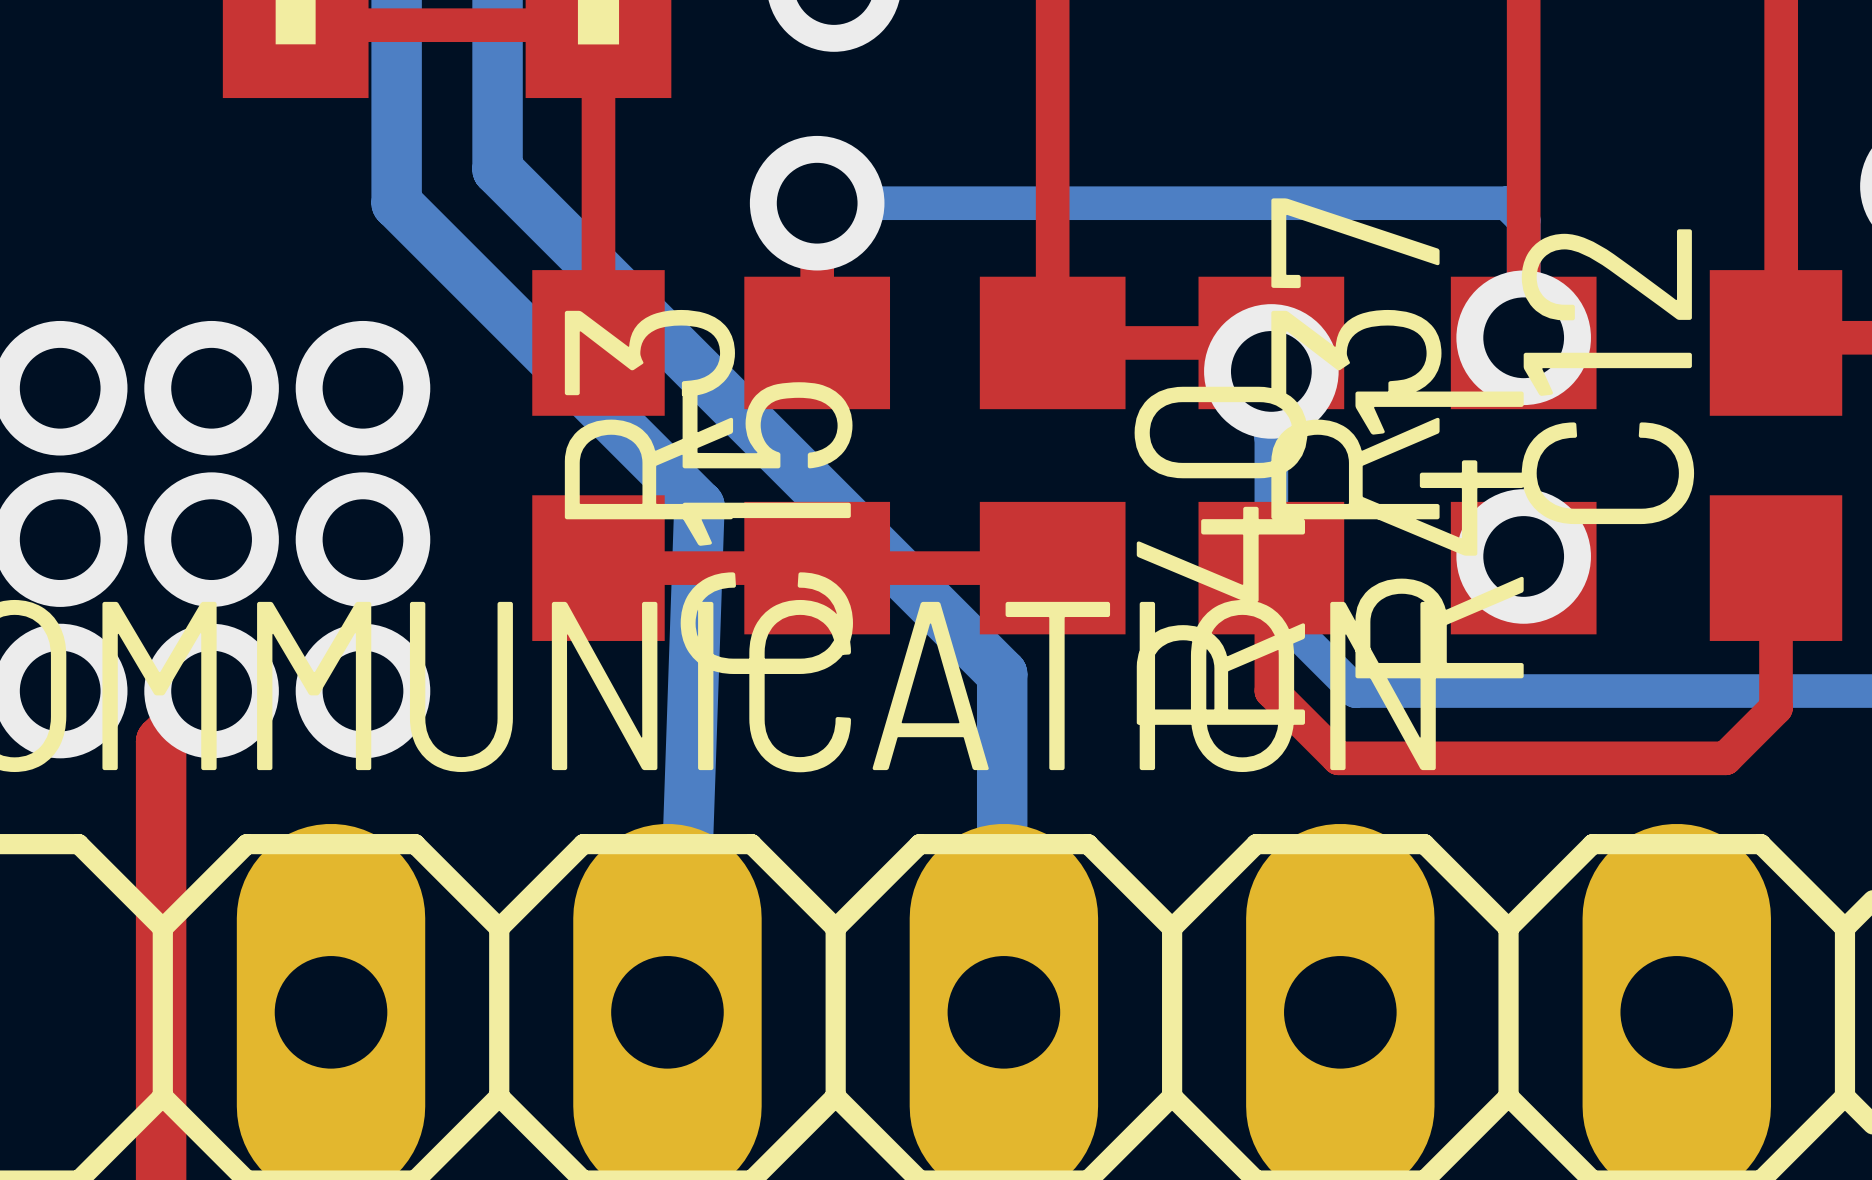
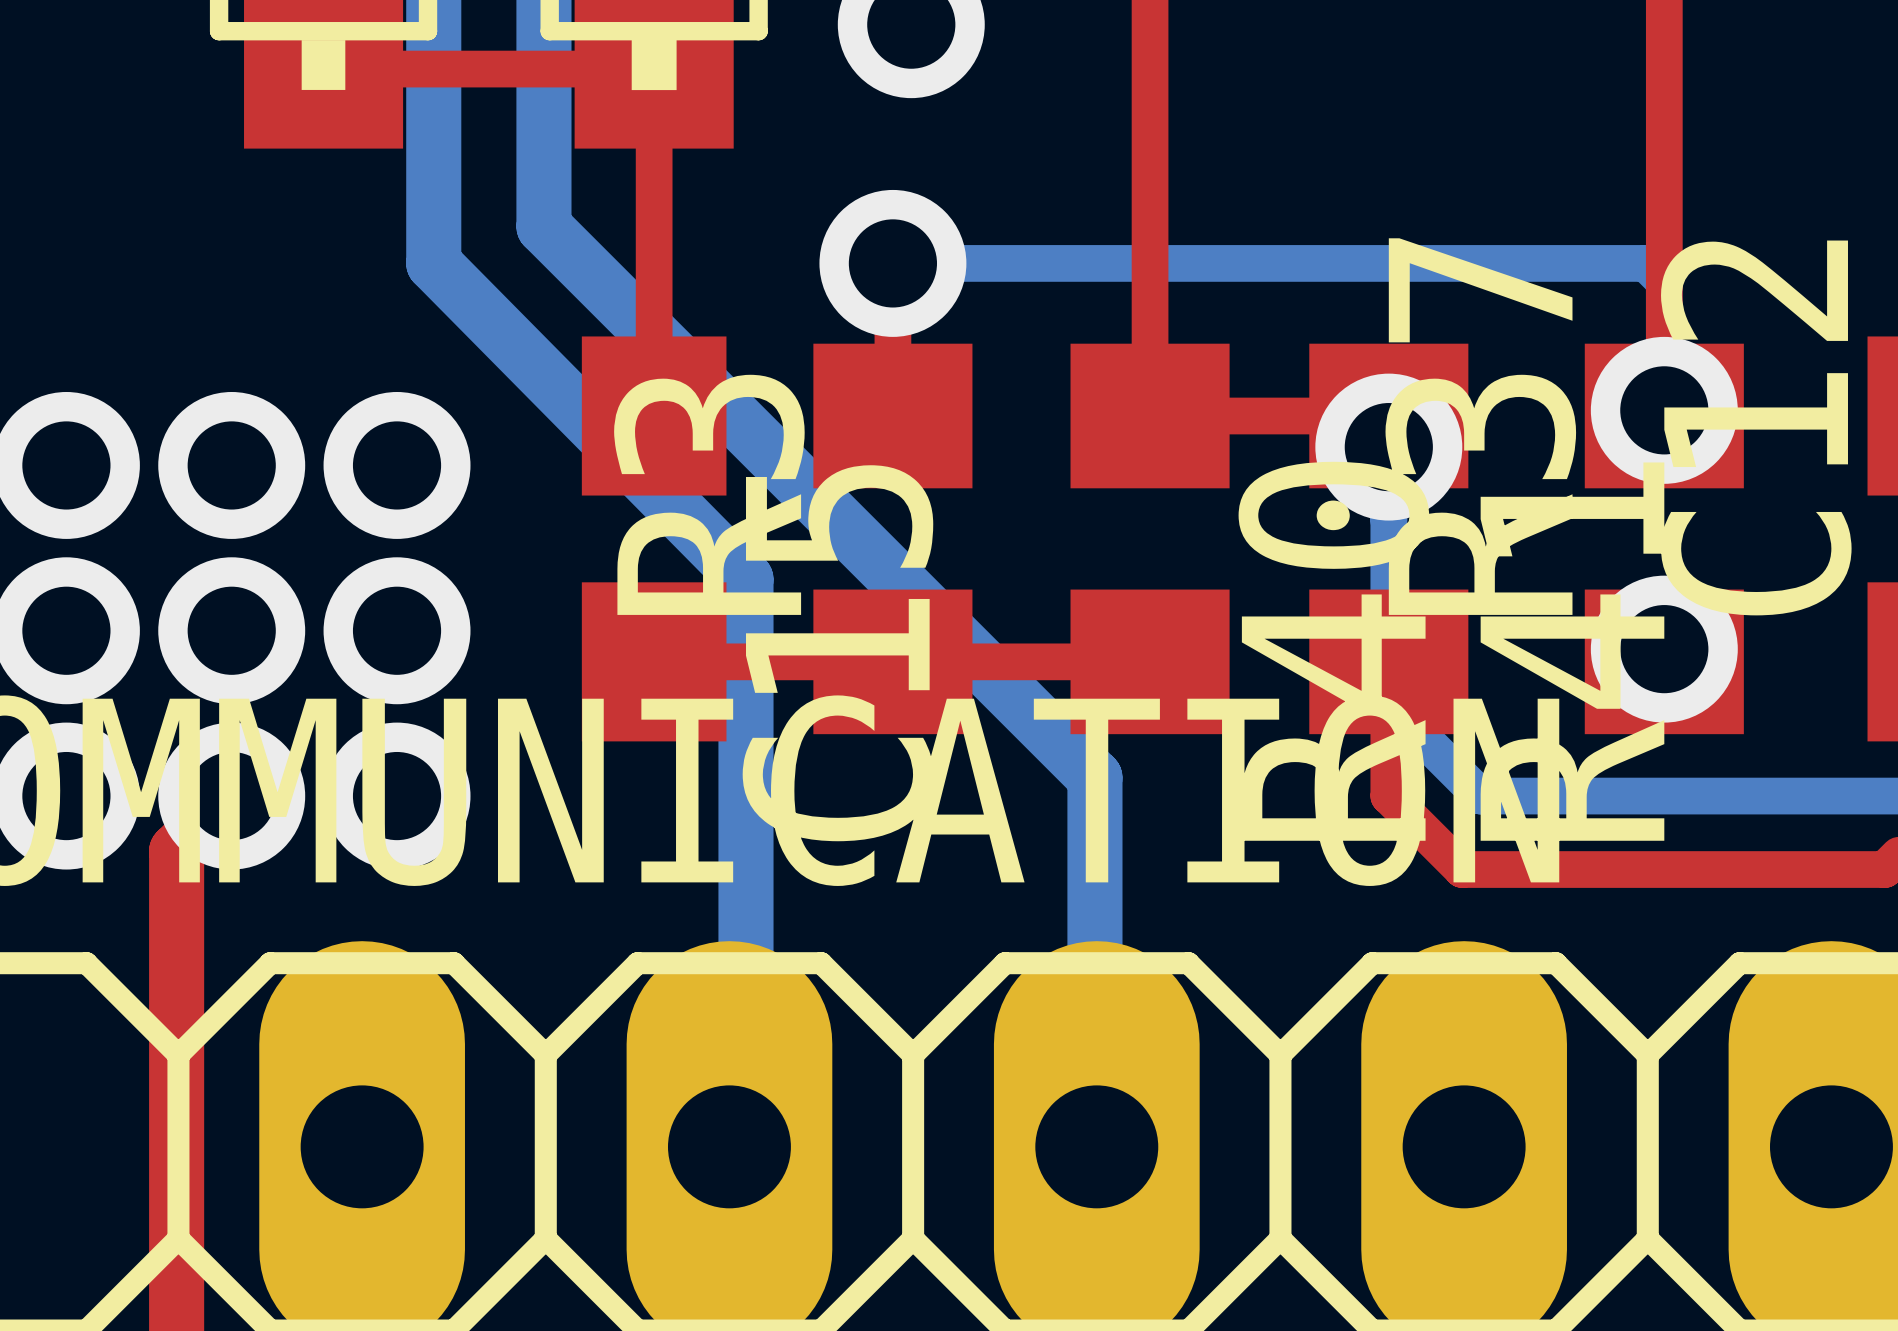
bottom track: (396, 203) (699, 506) (682, 997) -> (433, 263) (745, 579) (745, 1130)

